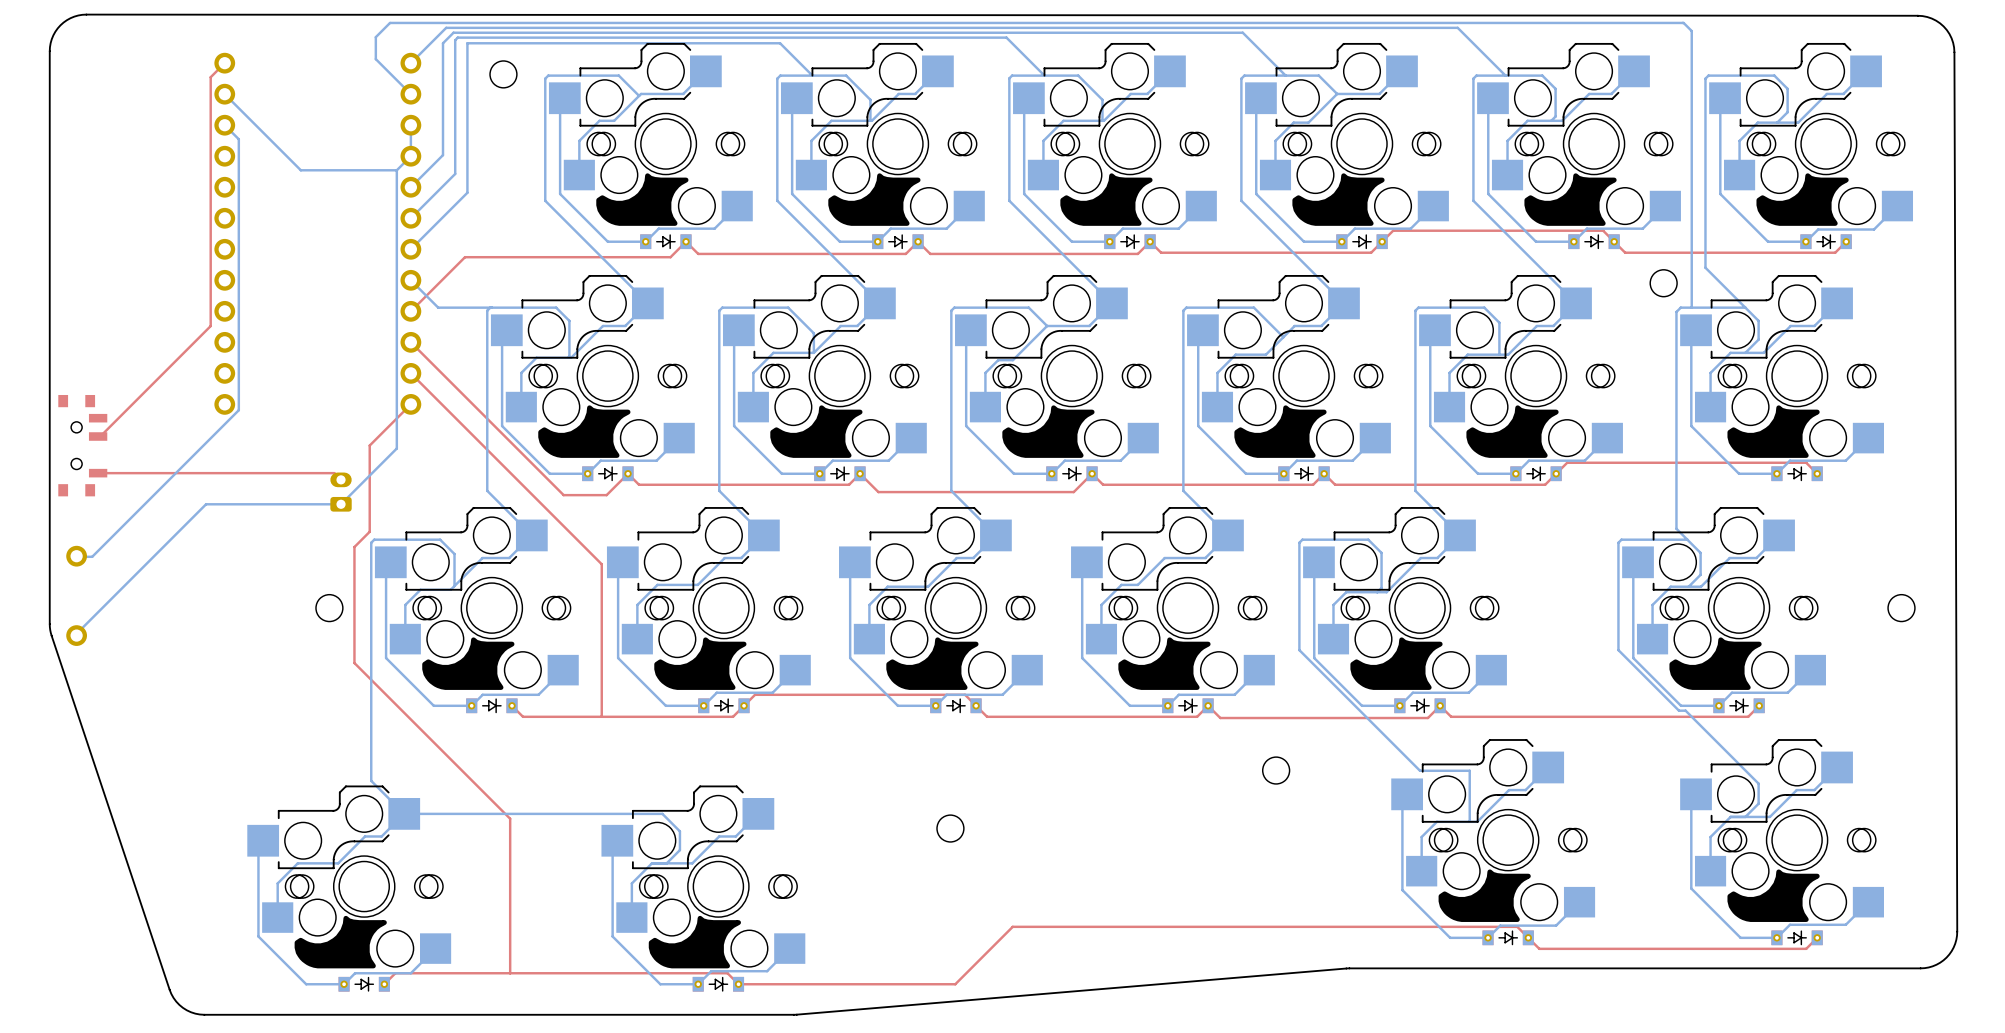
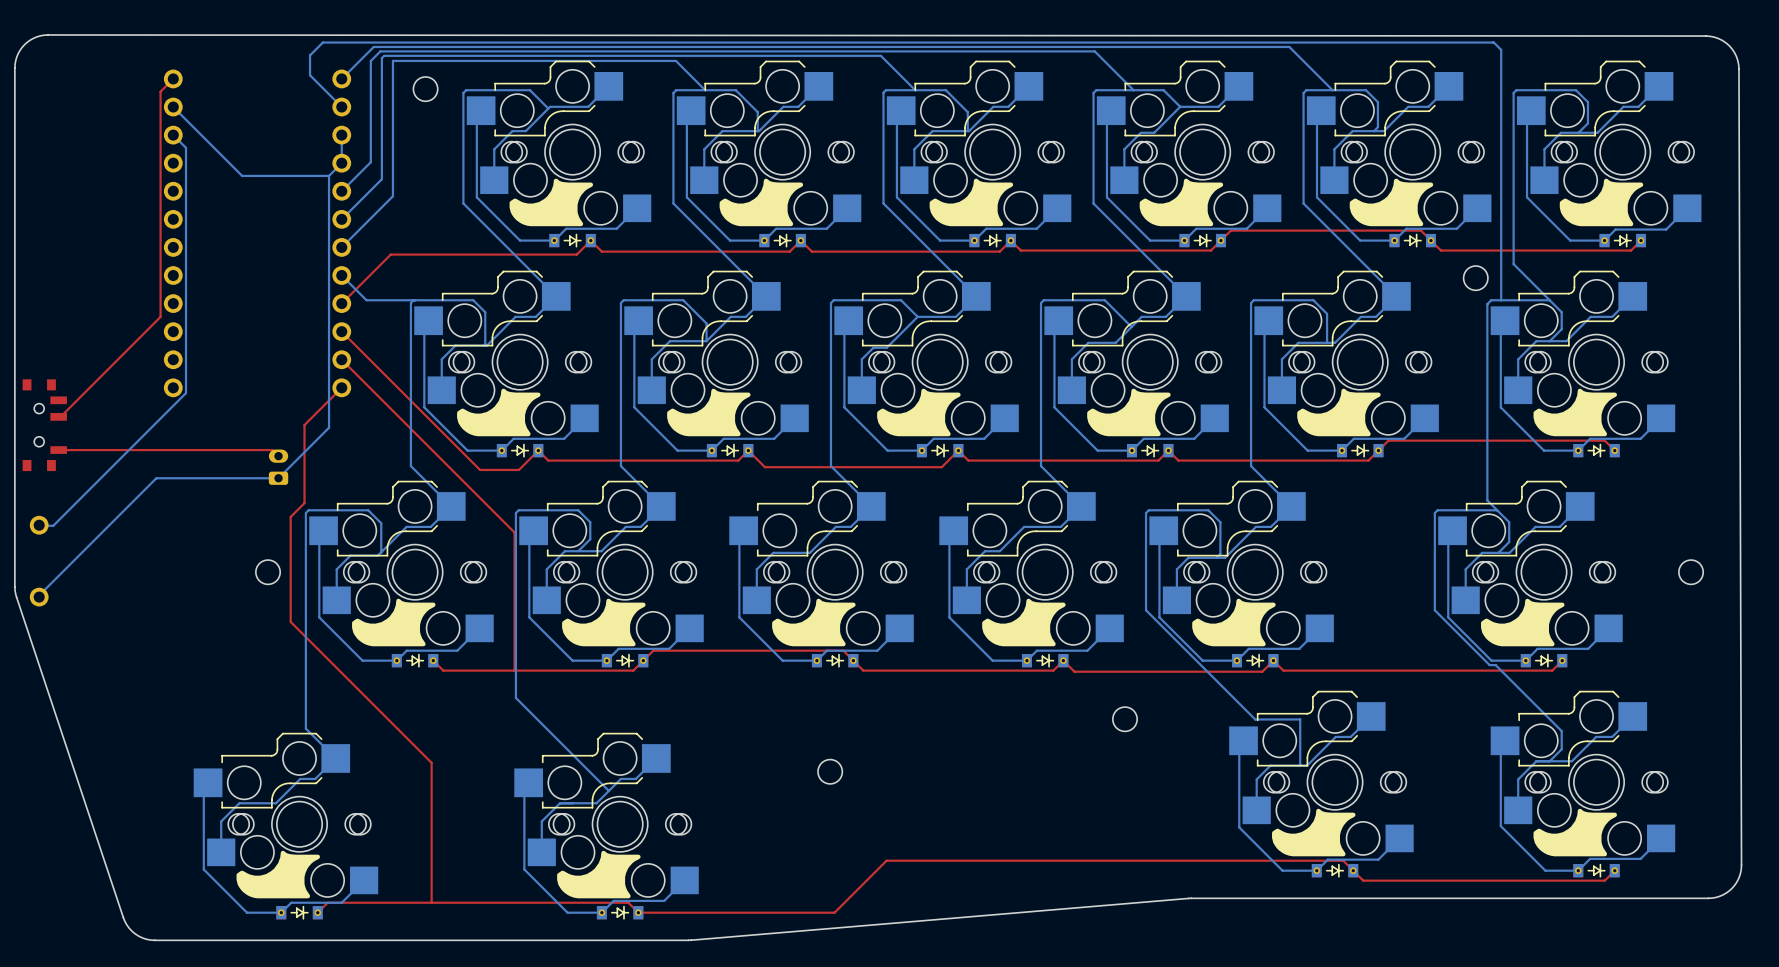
bottom track: none -> (578, 551) (590, 539) (590, 522) (578, 510) (518, 510) (515, 513) (515, 697) (608, 790)
bottom track: (404, 813) (662, 813) (679, 831) (679, 850) (666, 863) -> none

